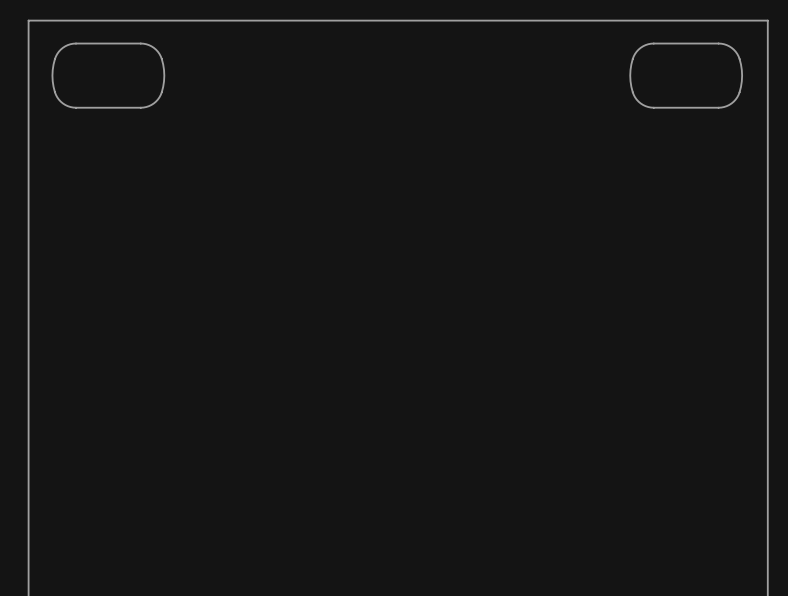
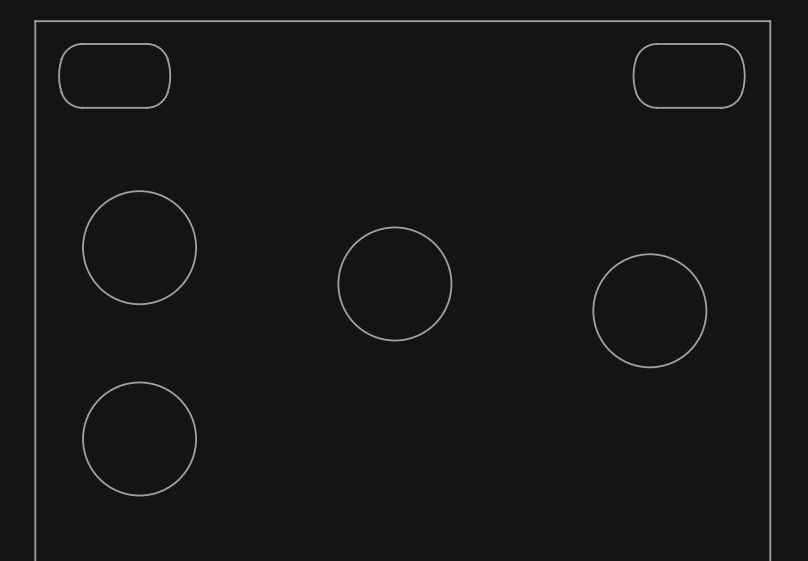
round board edge: none -> [82, 190, 198, 306]
round board edge: none -> [337, 226, 453, 342]
round board edge: none -> [592, 253, 708, 369]
round board edge: none -> [82, 381, 198, 497]

